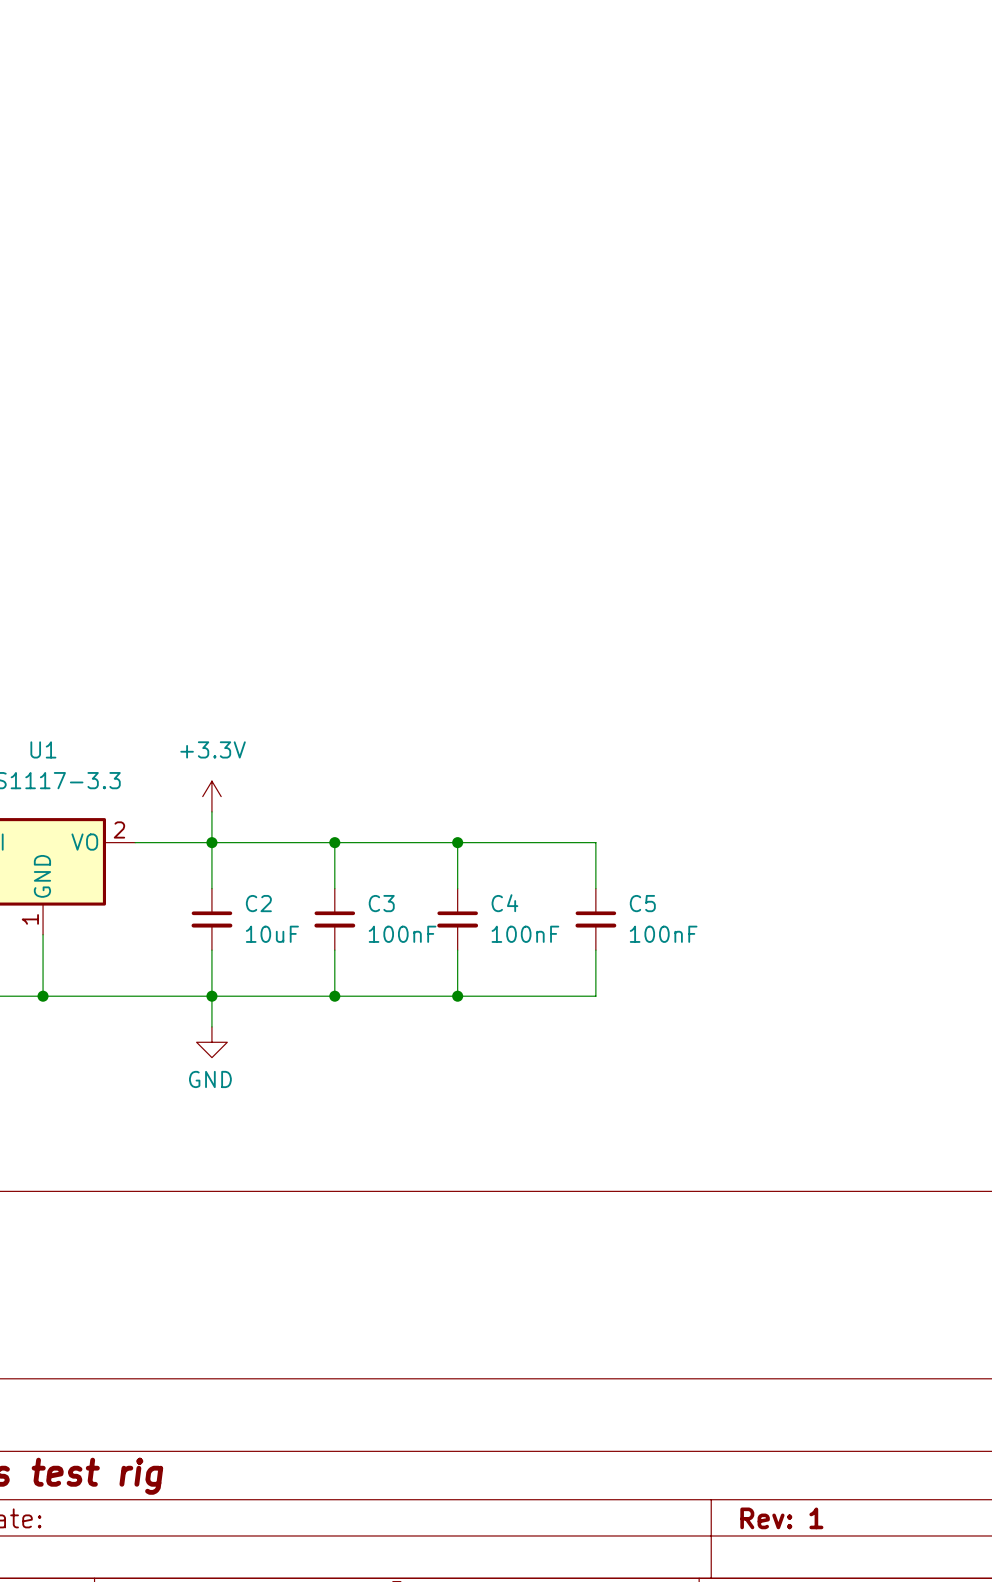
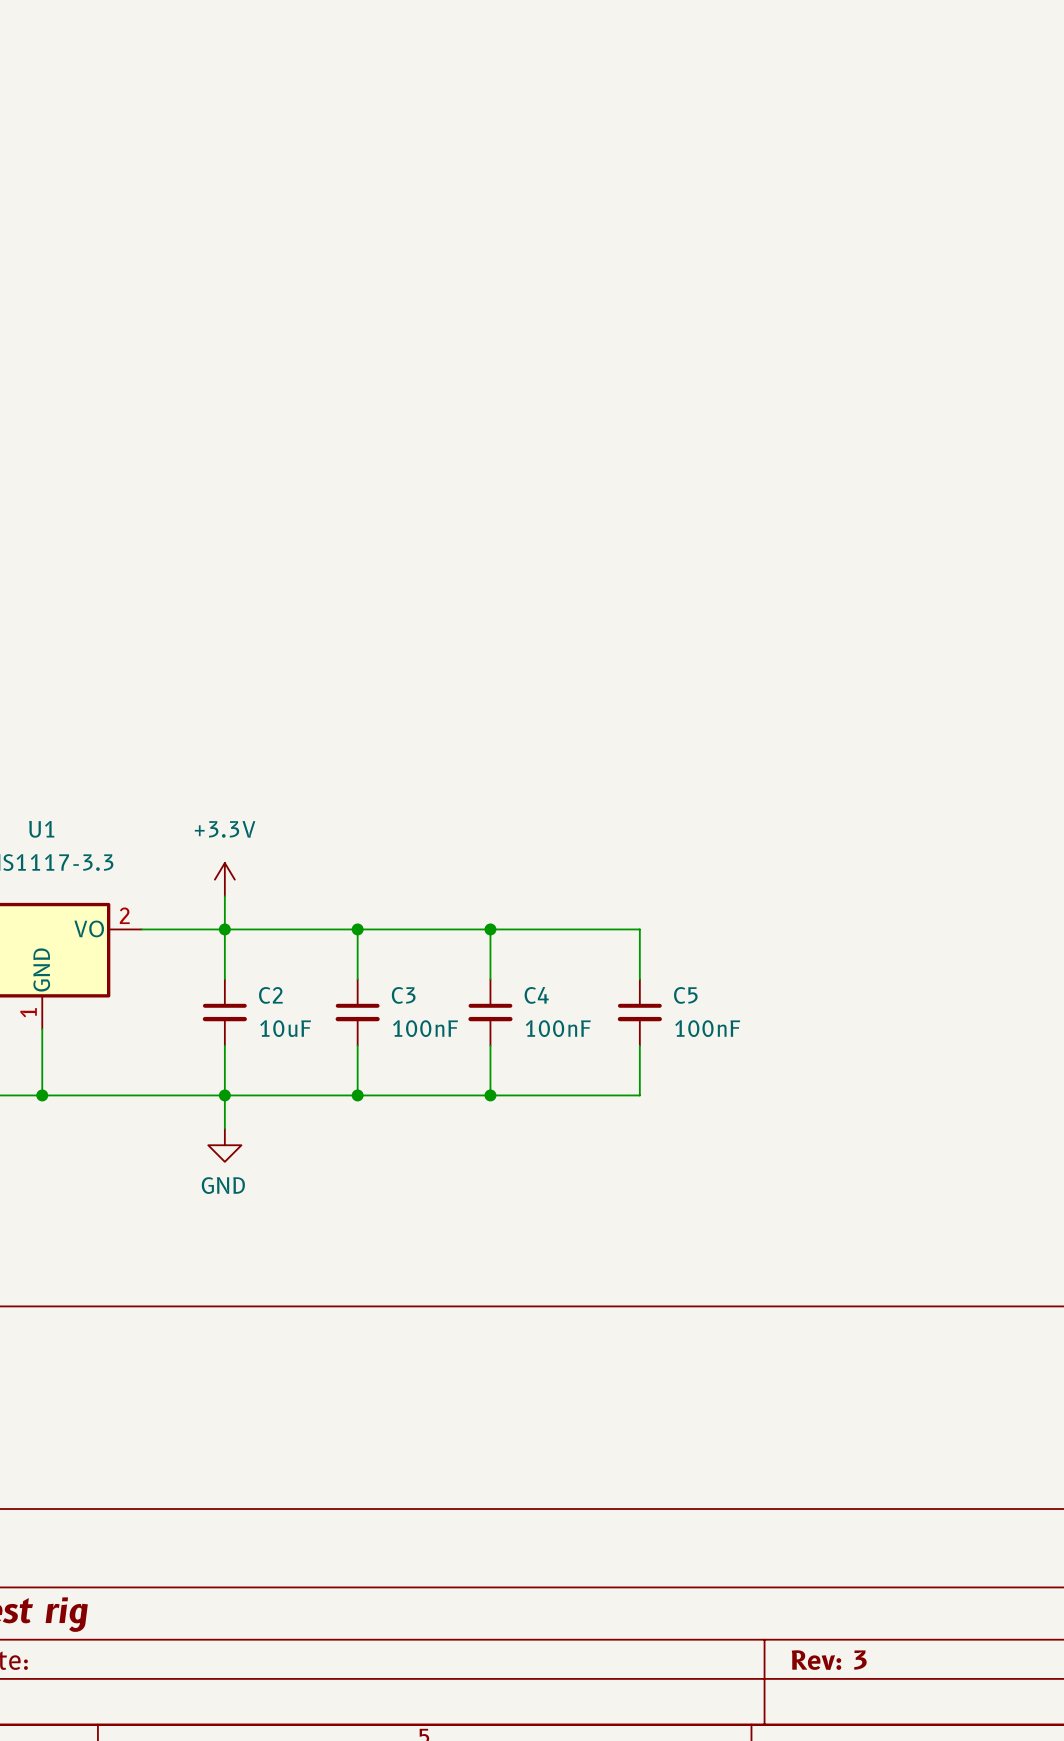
title block: Rev: 1 (781, 1518) -> Rev: 3 (829, 1660)

